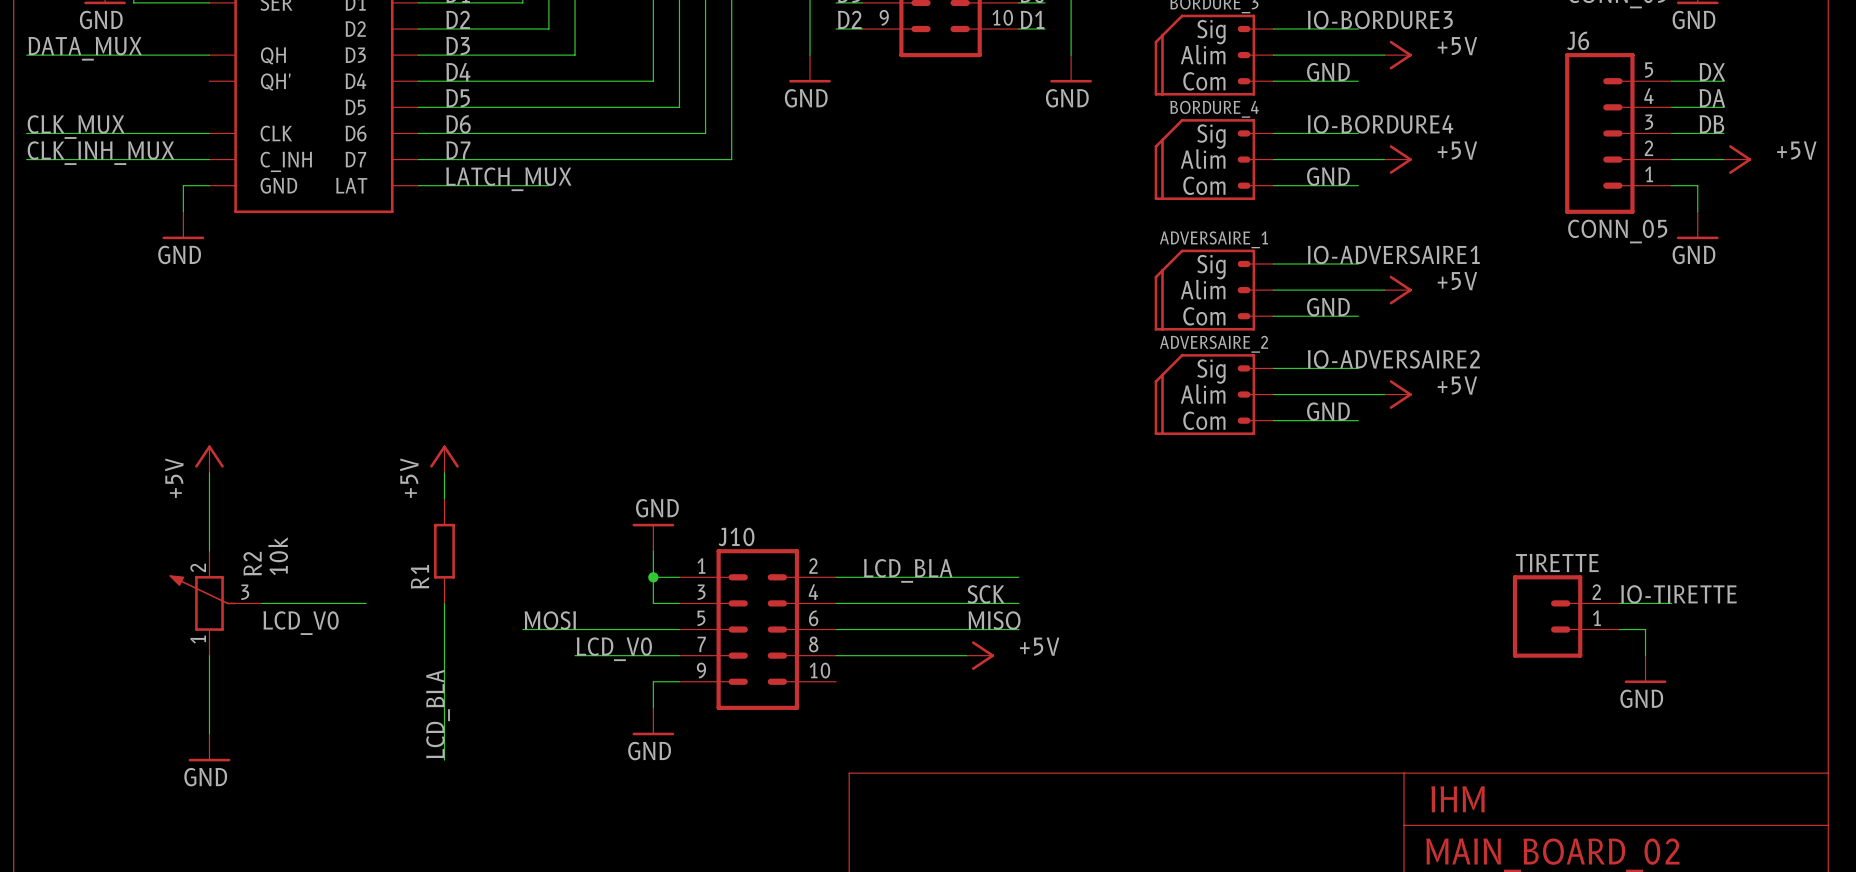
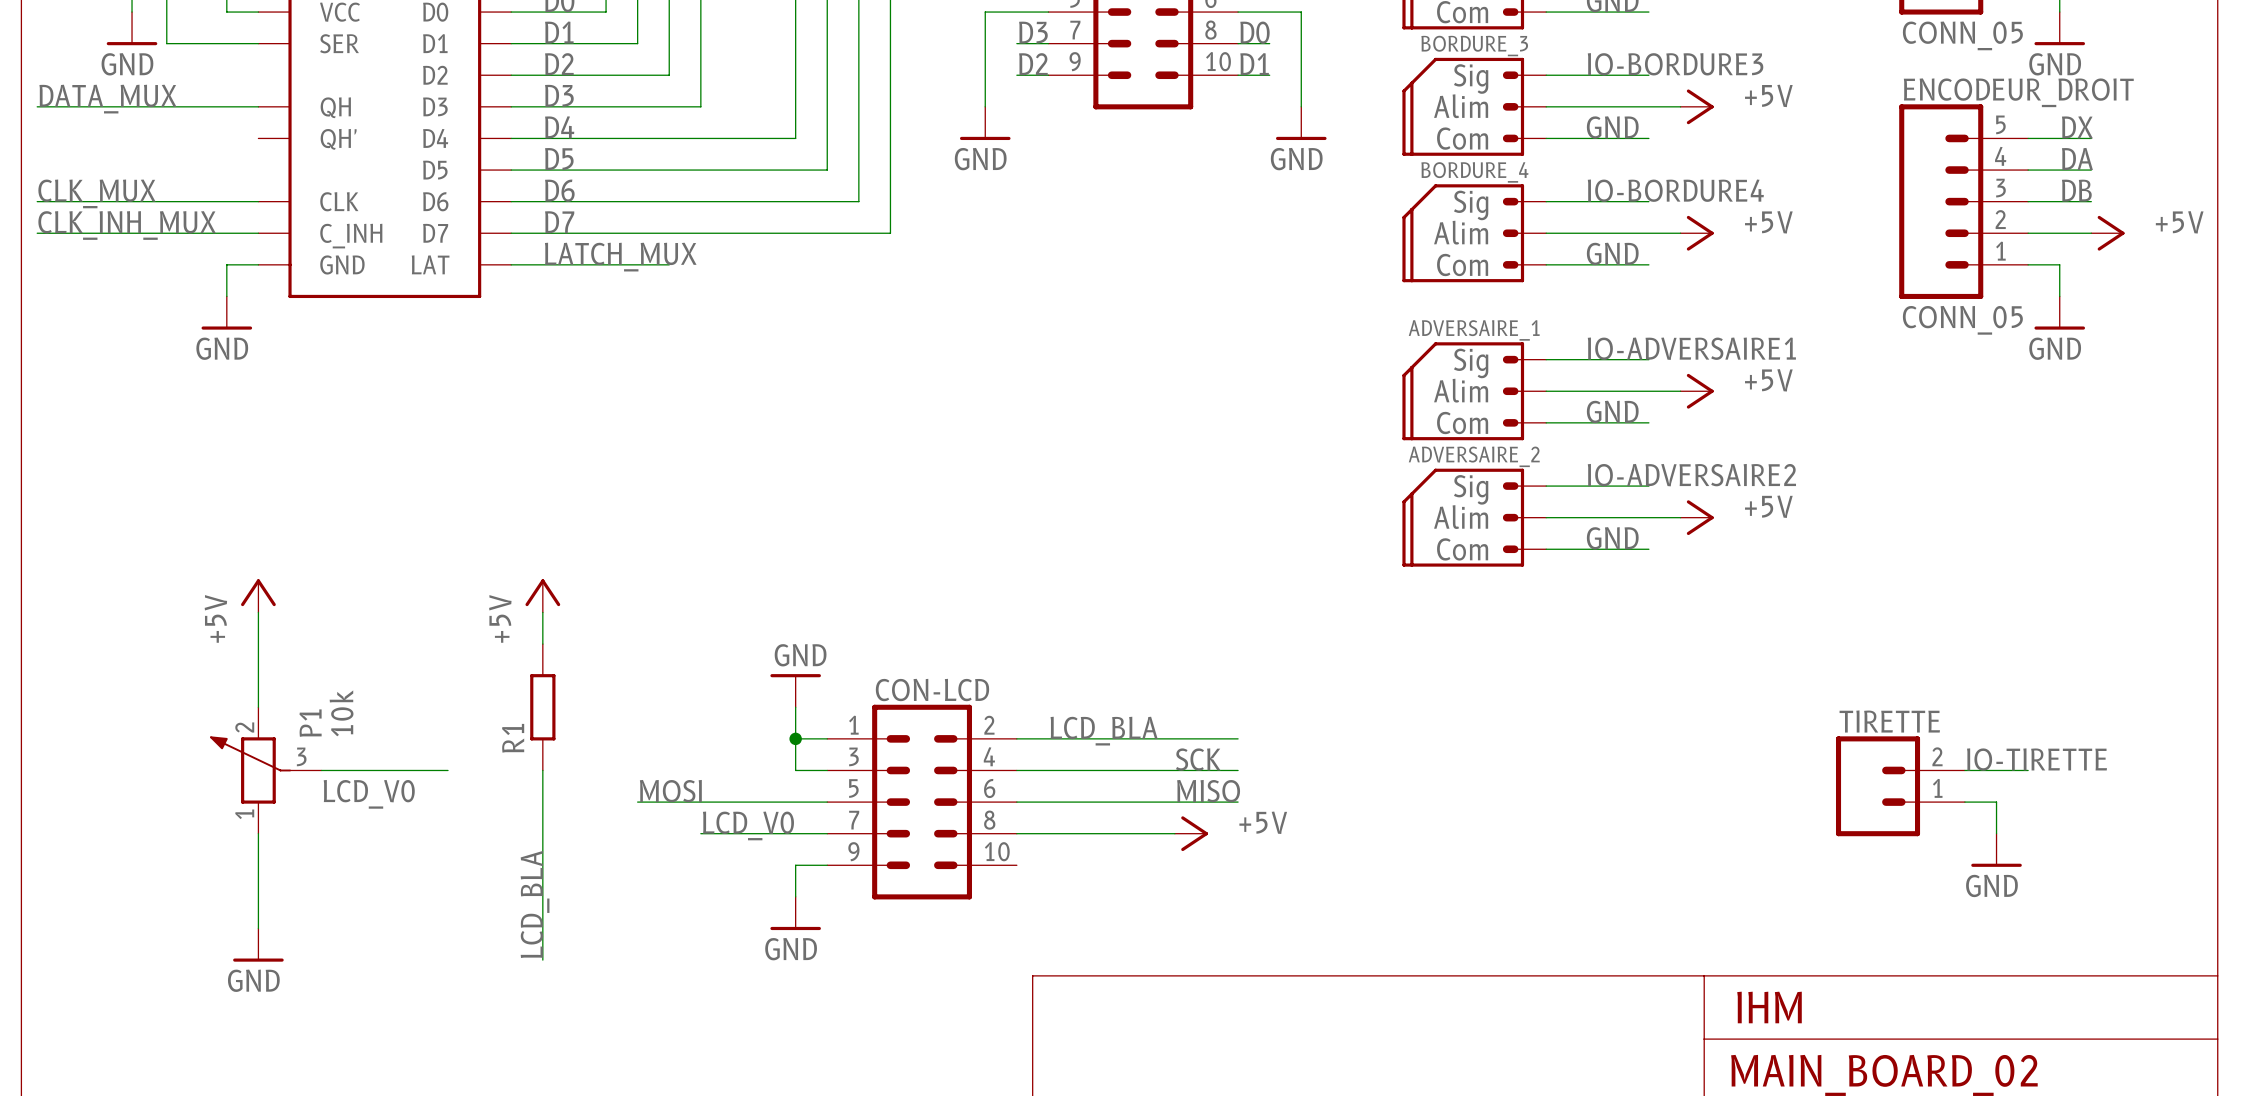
J6 name: J6 (1578, 40) -> ENCODEUR_DROIT (2018, 92)
J10 name: J10 (736, 536) -> CON-LCD (932, 690)
R2 name: R2 (252, 563) -> P1 (310, 723)

